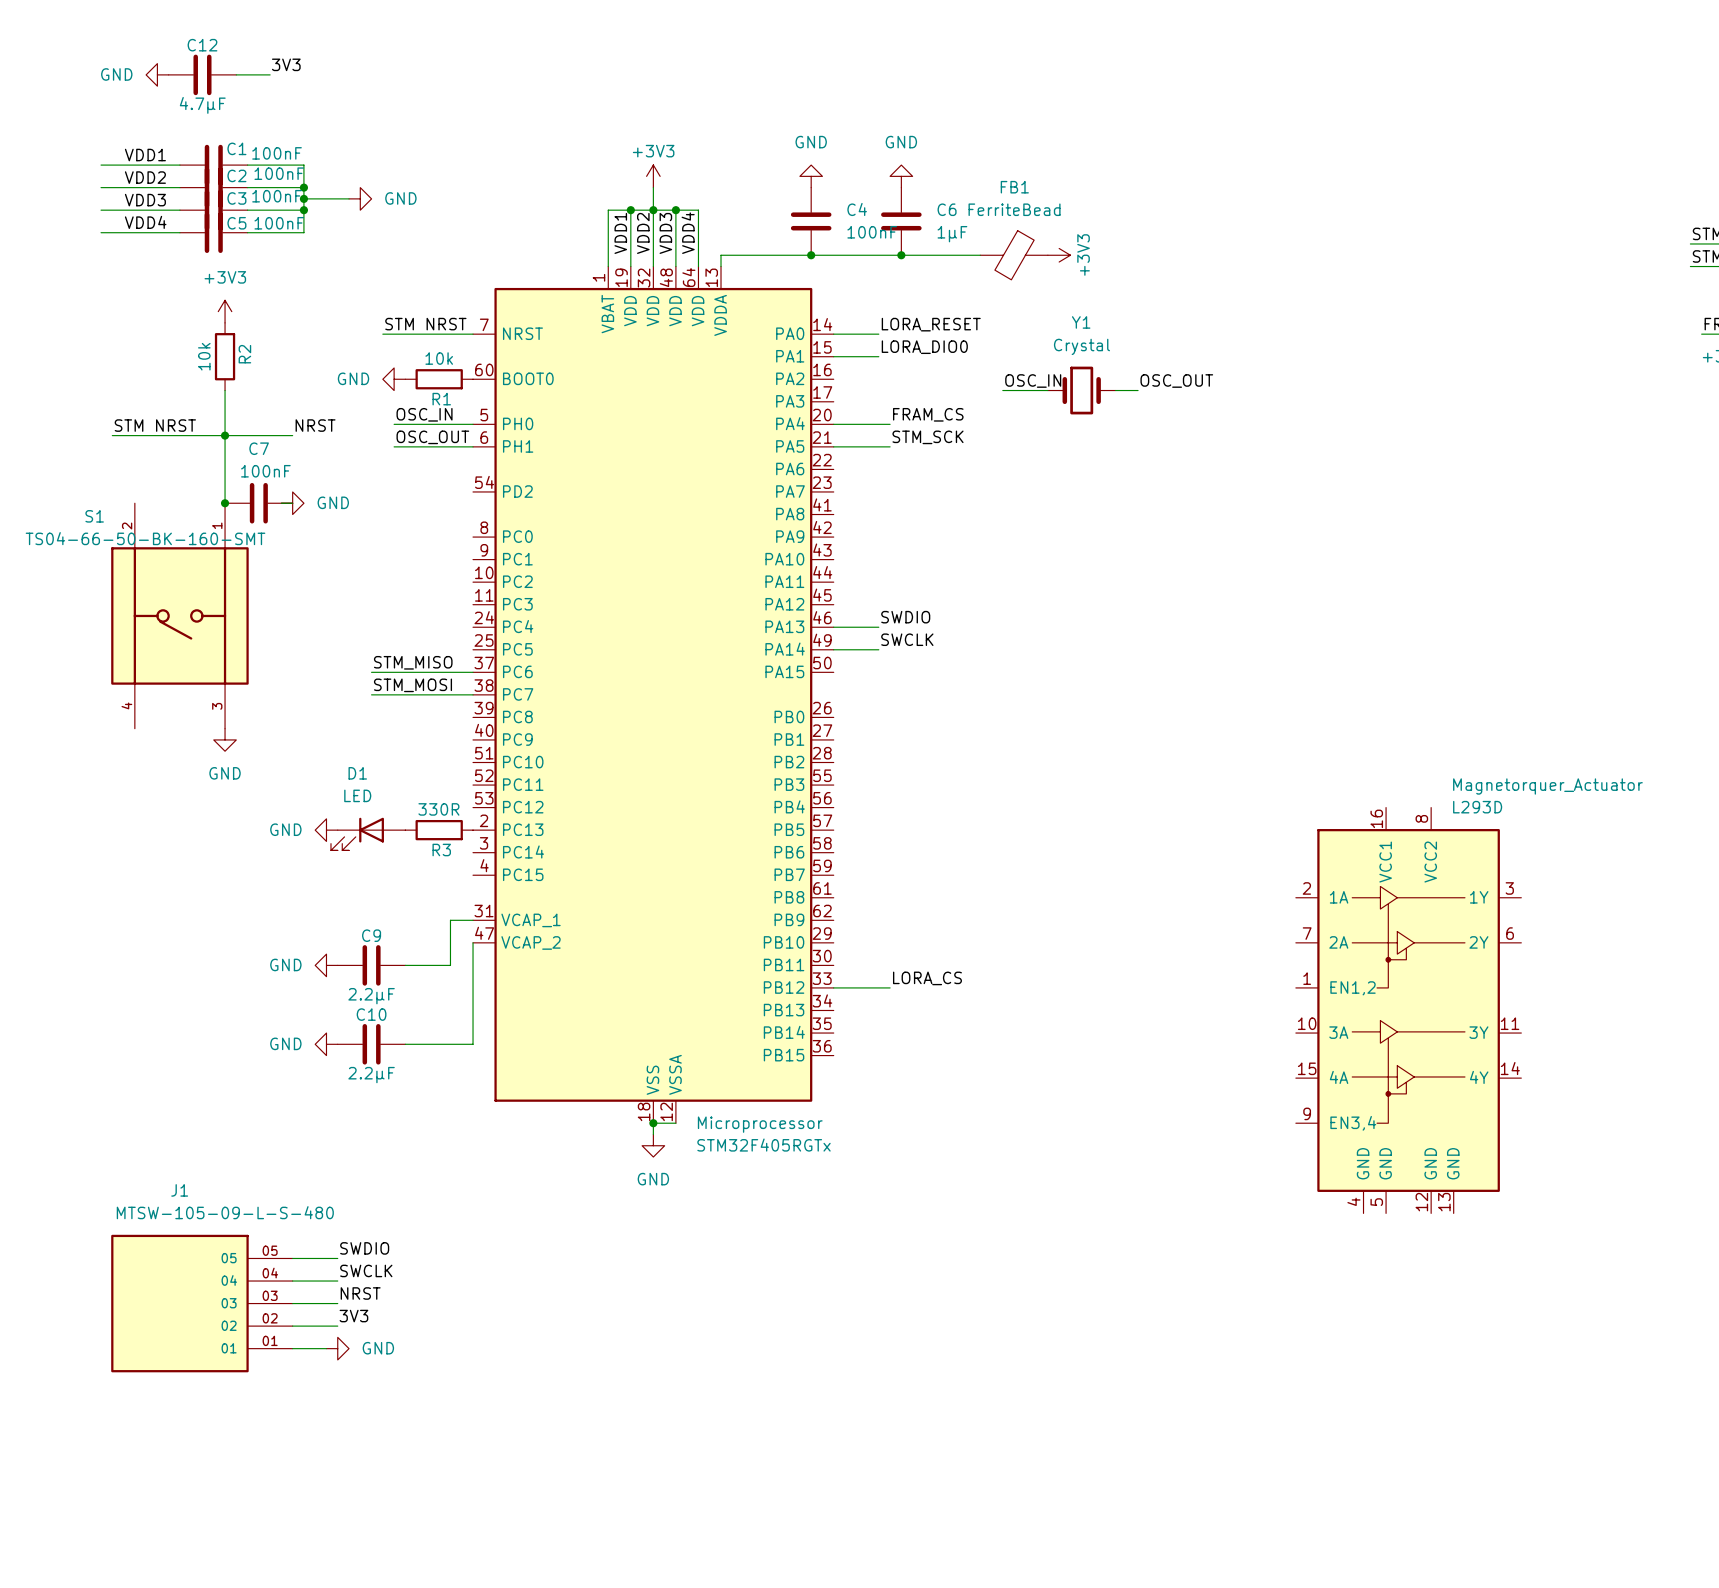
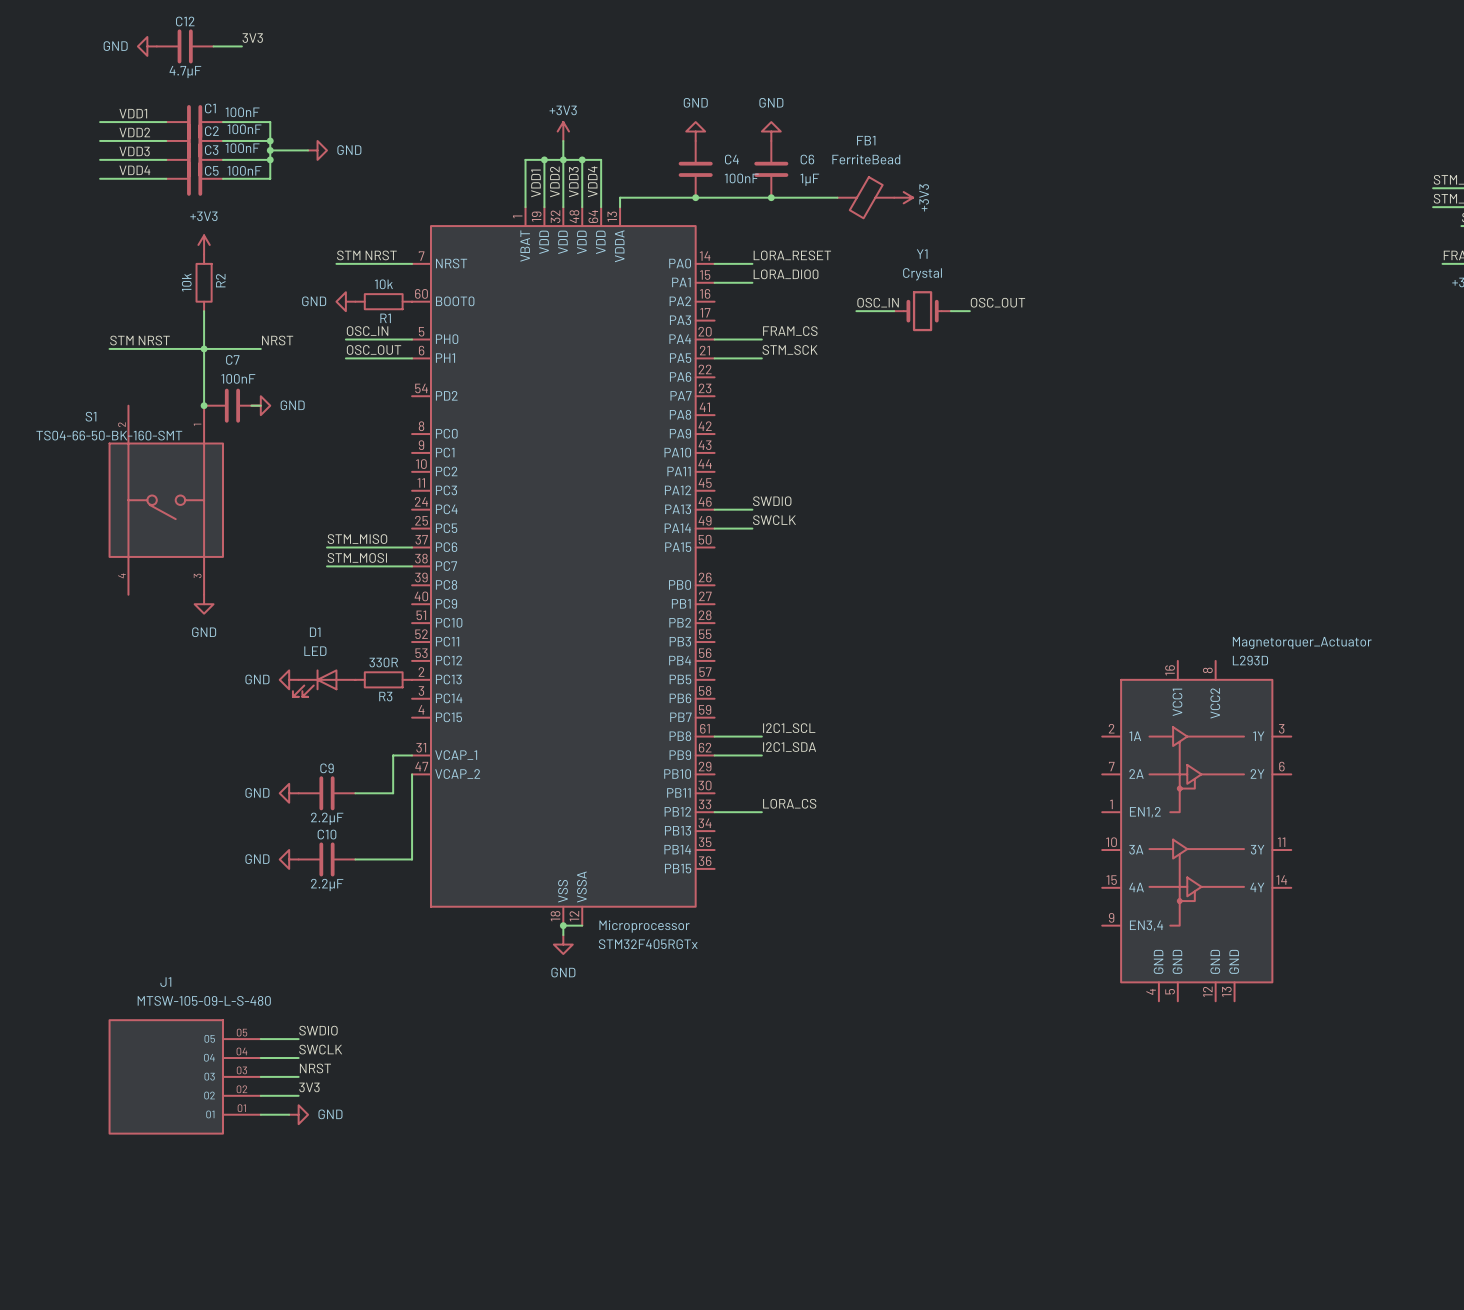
label: none -> I2C1_SCL (789, 728)
wire: none -> (714, 736) (761, 736)
label: none -> I2C1_SDA (789, 747)
wire: none -> (714, 755) (761, 755)

